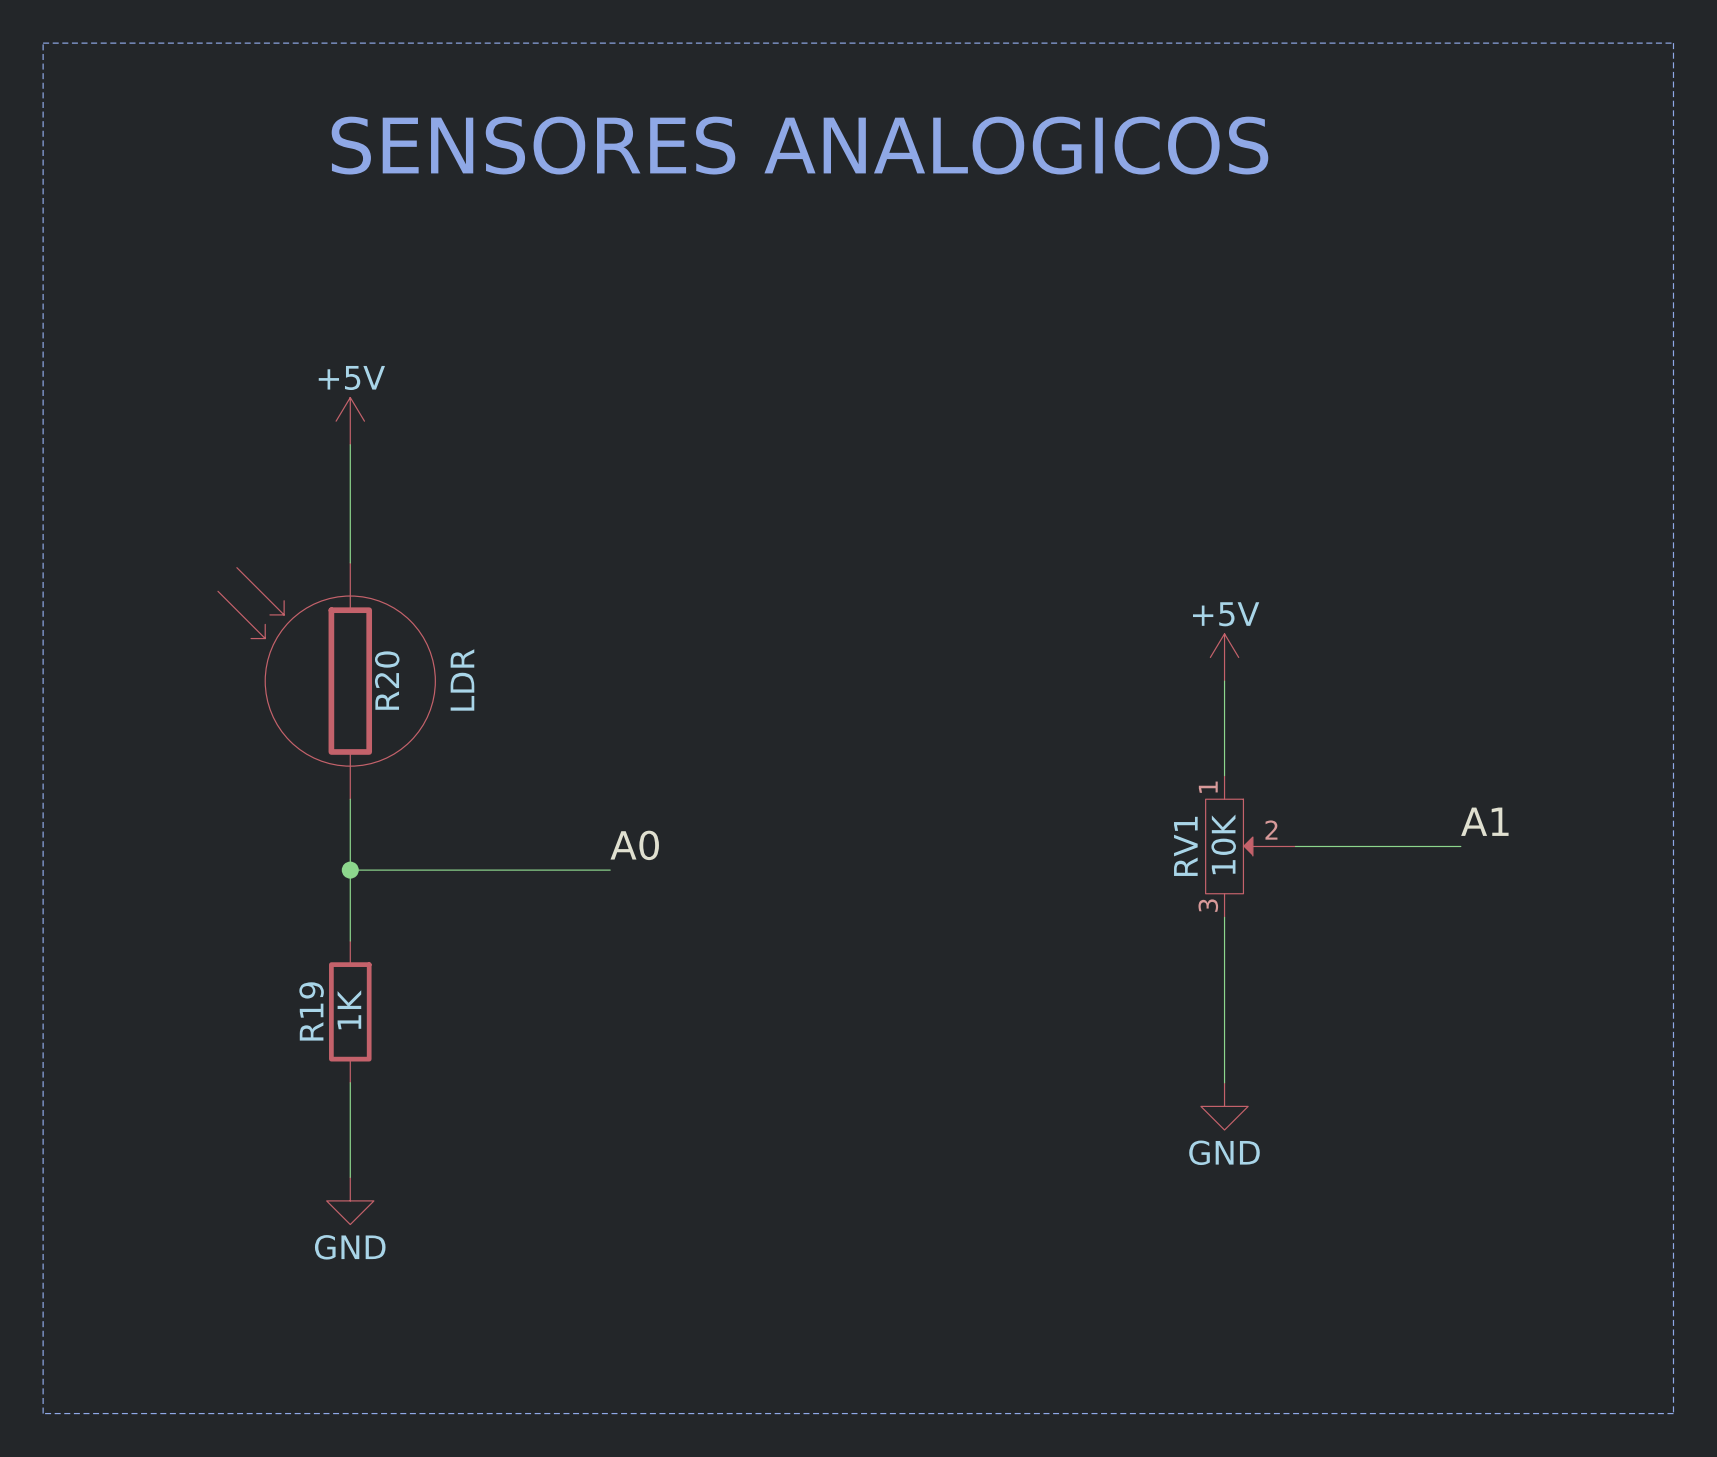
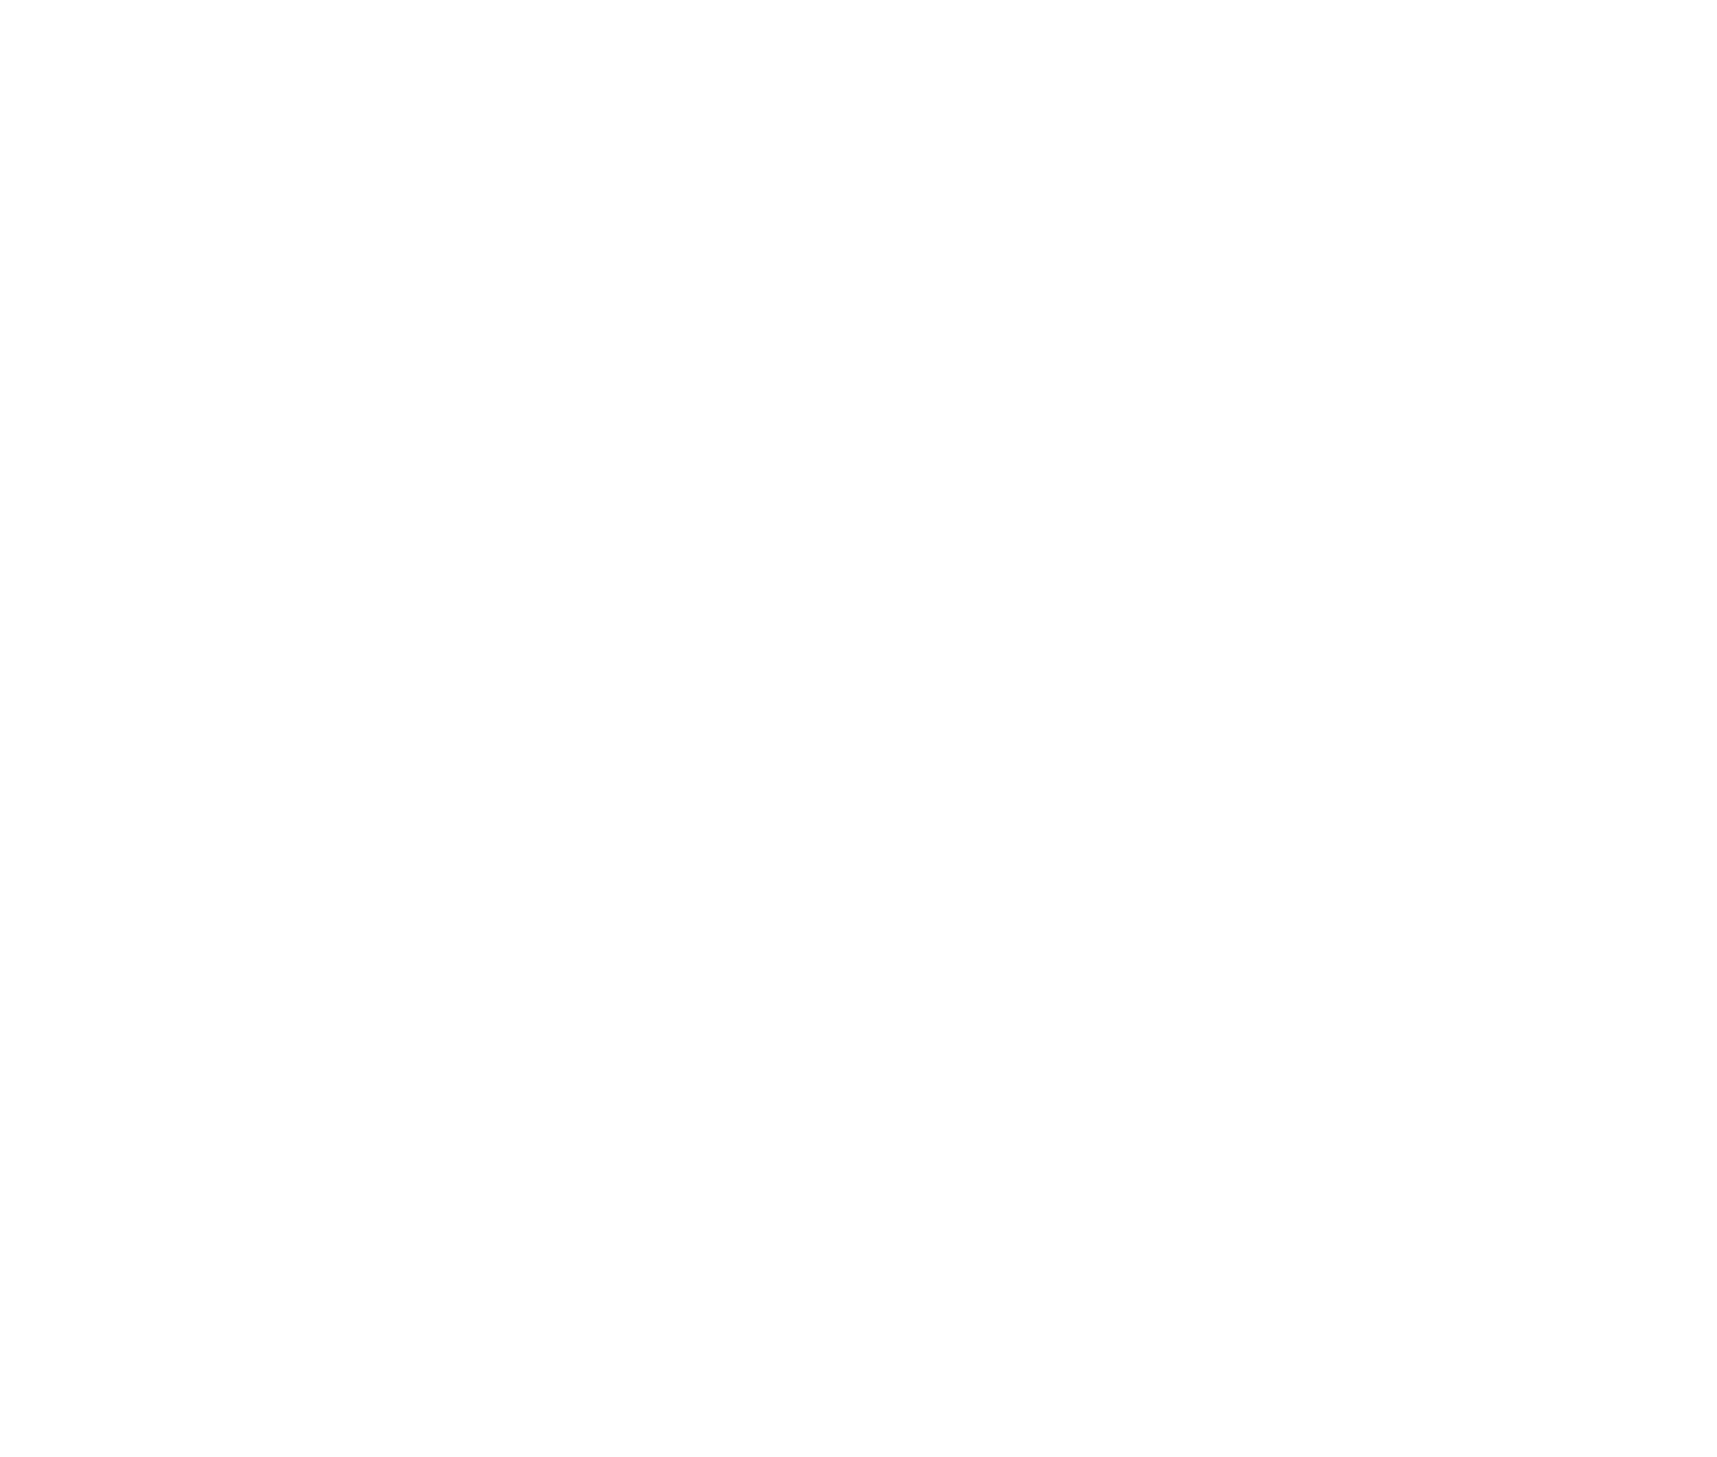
line: (43, 43) (1673, 43) (1673, 1413) (43, 1413) (43, 43) -> none
text: SENSORES ANALOGICOS (799, 145) -> none
power symbol: +5V (350, 421) -> none
wire: (350, 444) (350, 562) -> none
power symbol: +5V (1224, 657) -> none
R20: LDR (326, 681) -> none
wire: (1224, 681) (1224, 775) -> none
wire: (350, 799) (350, 941) -> none
label: A1 (1484, 821) -> none
label: A0 (634, 845) -> none
RV1: 10K (1250, 846) -> none
wire: (1295, 846) (1460, 846) -> none
wire: (350, 870) (610, 870) -> none
junction: (350, 870) -> none
wire: (1224, 917) (1224, 1082) -> none
R19: 1K (350, 1011) -> none
wire: (350, 1082) (350, 1177) -> none
power symbol: GND (1224, 1106) -> none
power symbol: GND (350, 1200) -> none

